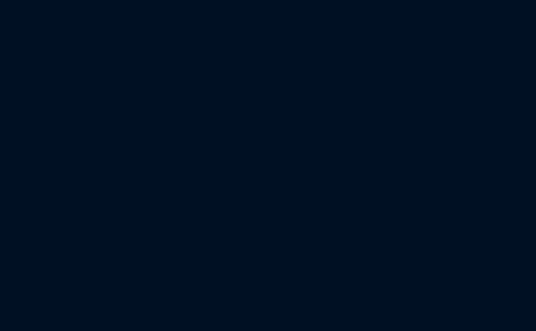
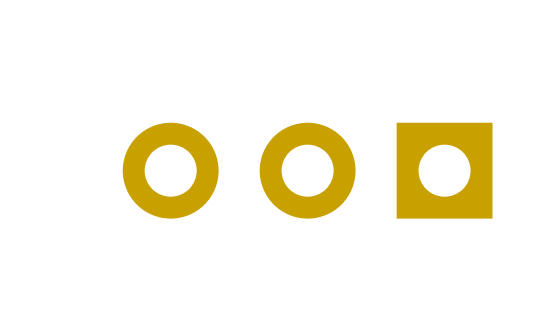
part: none -> (307, 170)

